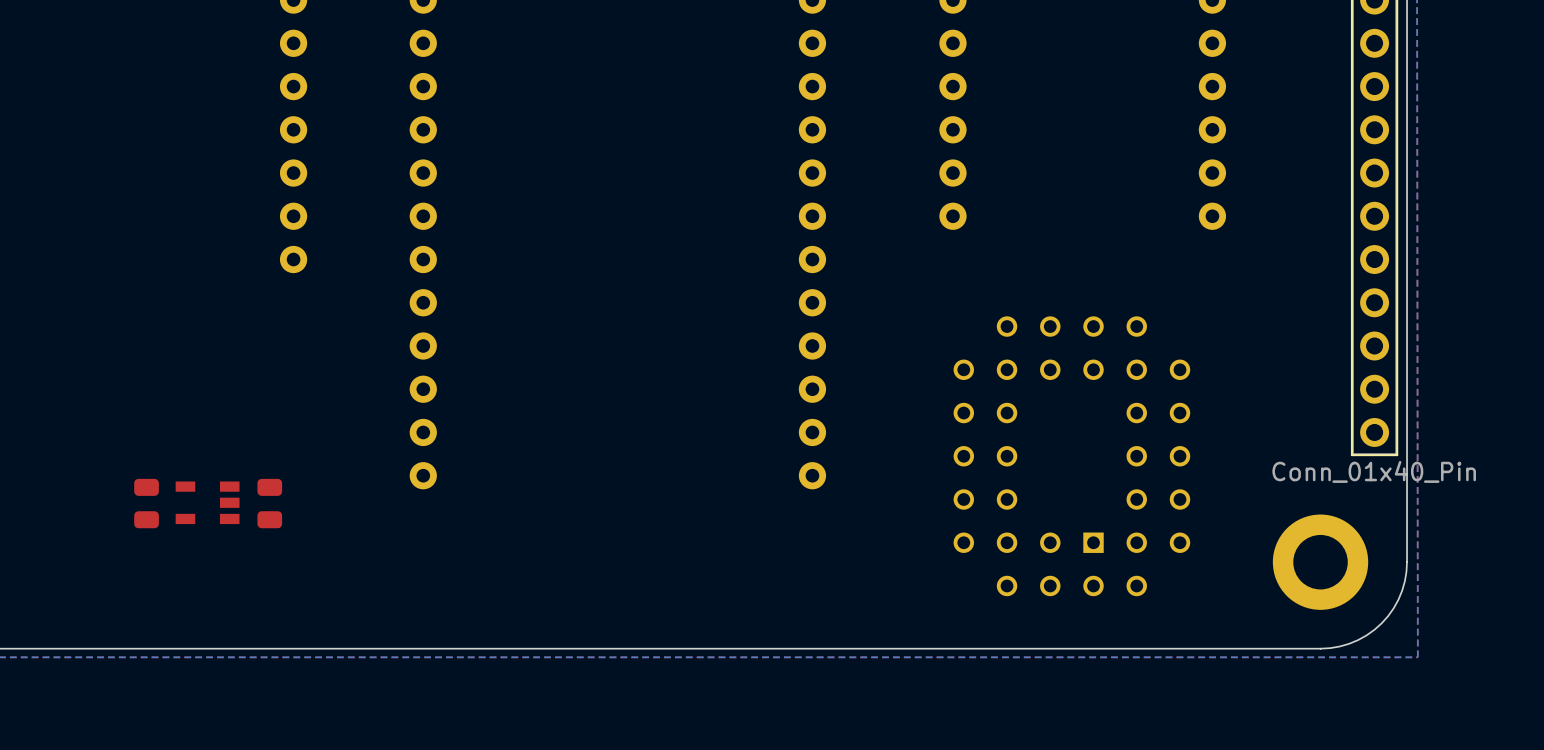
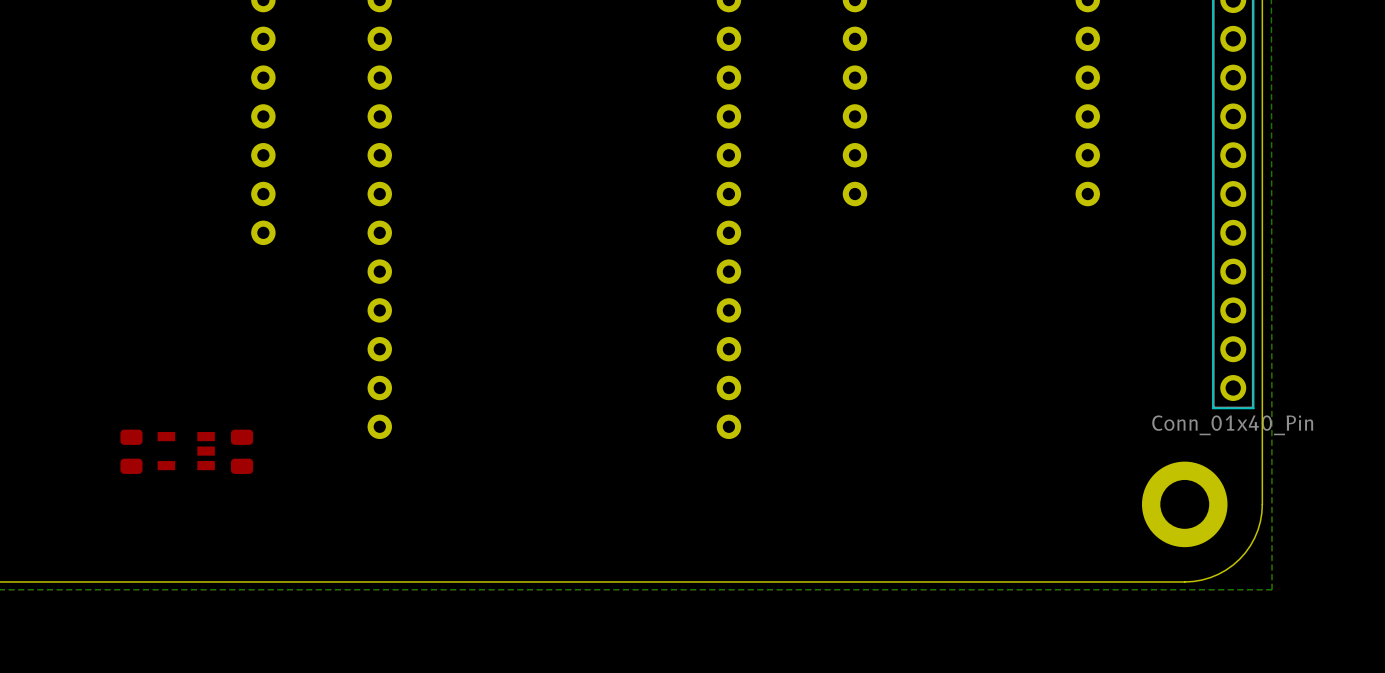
part: (1071, 456) -> none

